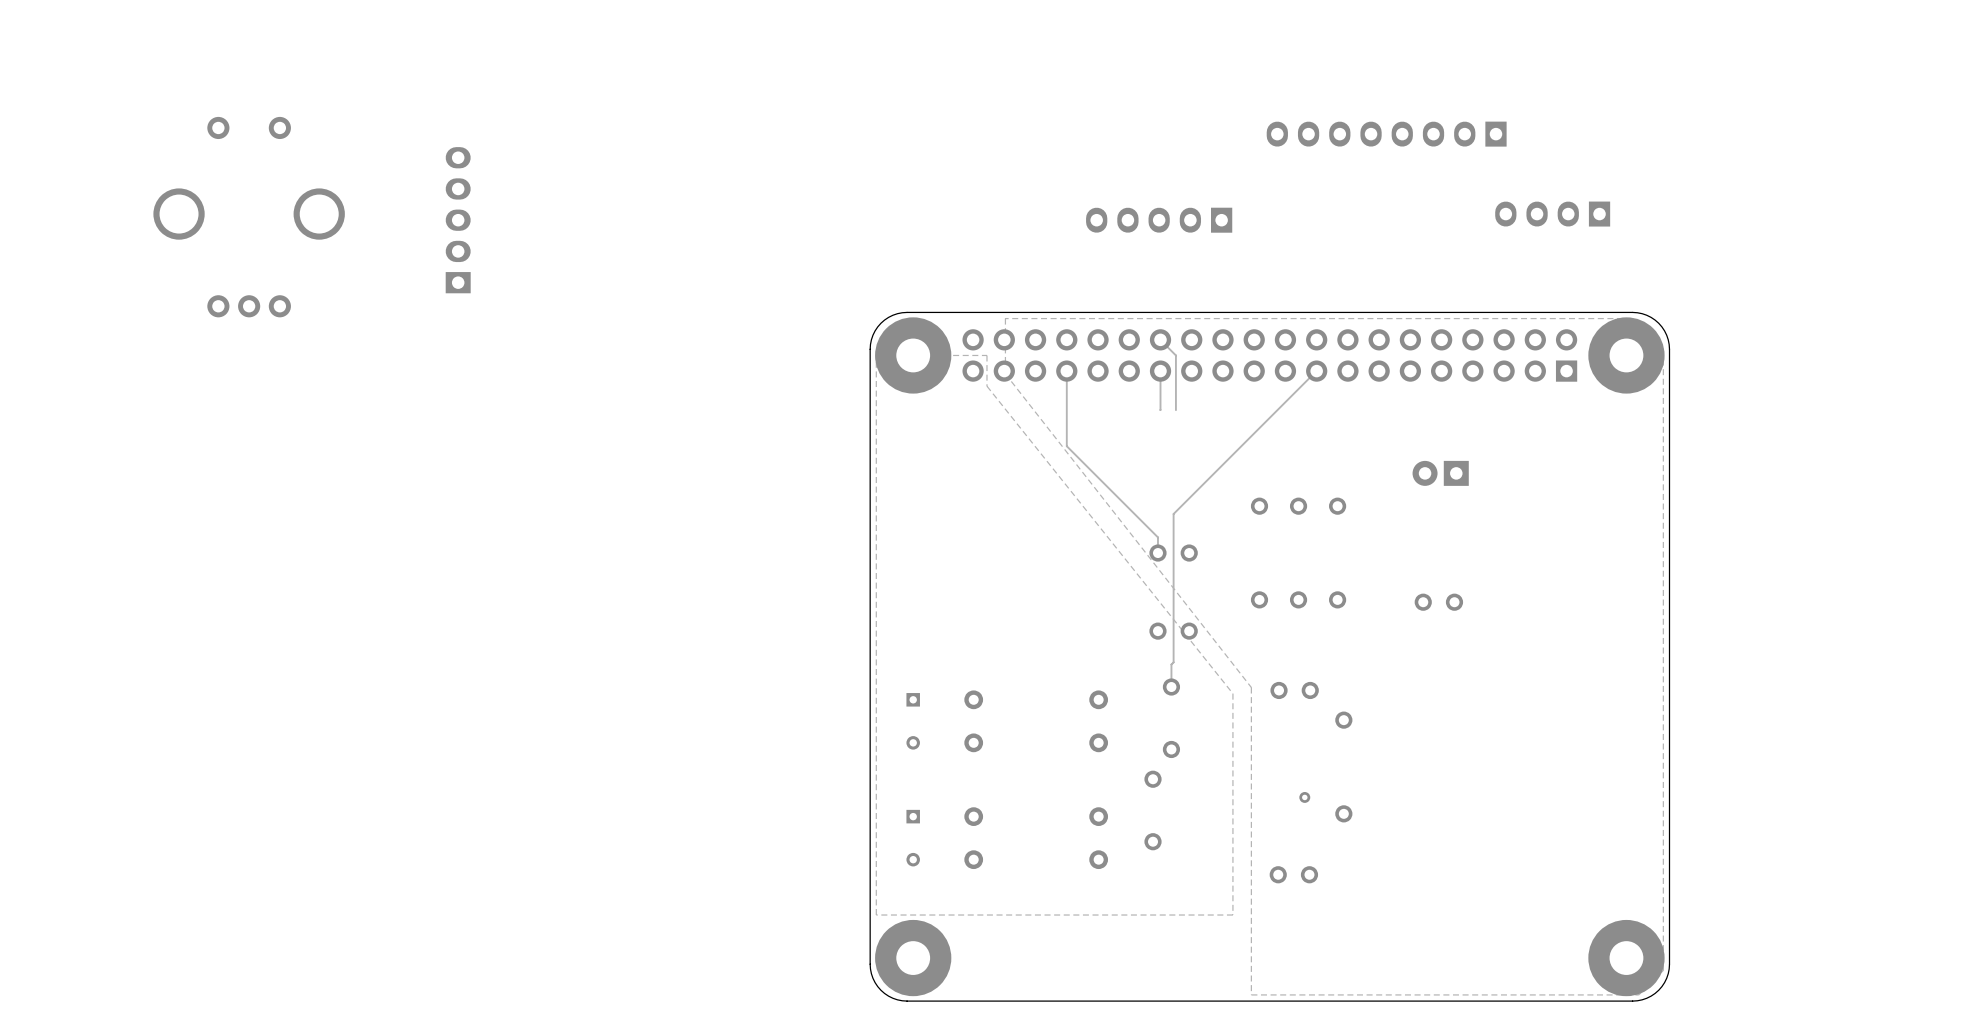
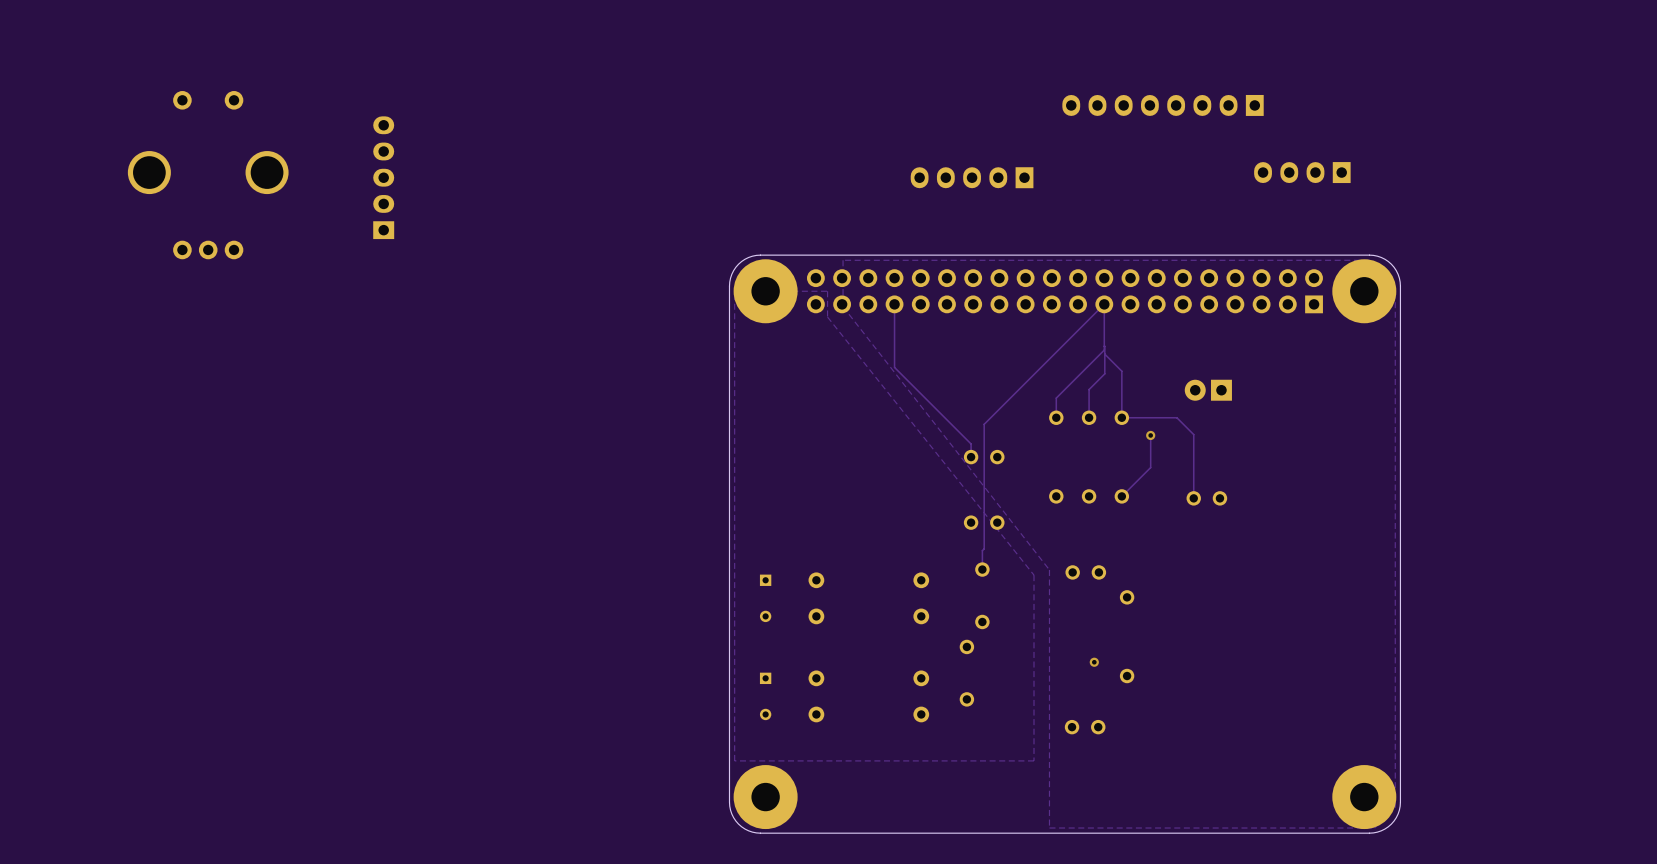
track: (1160, 340) (1175, 355) (1175, 410) -> none
track: (1160, 371) (1160, 410) -> none
track: none -> (1104, 304) (1104, 350) (1056, 398) (1056, 417)
track: none -> (1104, 346) (1104, 373) (1089, 389) (1089, 417)
track: none -> (1104, 354) (1121, 371) (1121, 417) (1176, 417) (1193, 434) (1193, 498)
track: none -> (1150, 435) (1150, 467) (1121, 496)
via: none -> (1150, 435)

